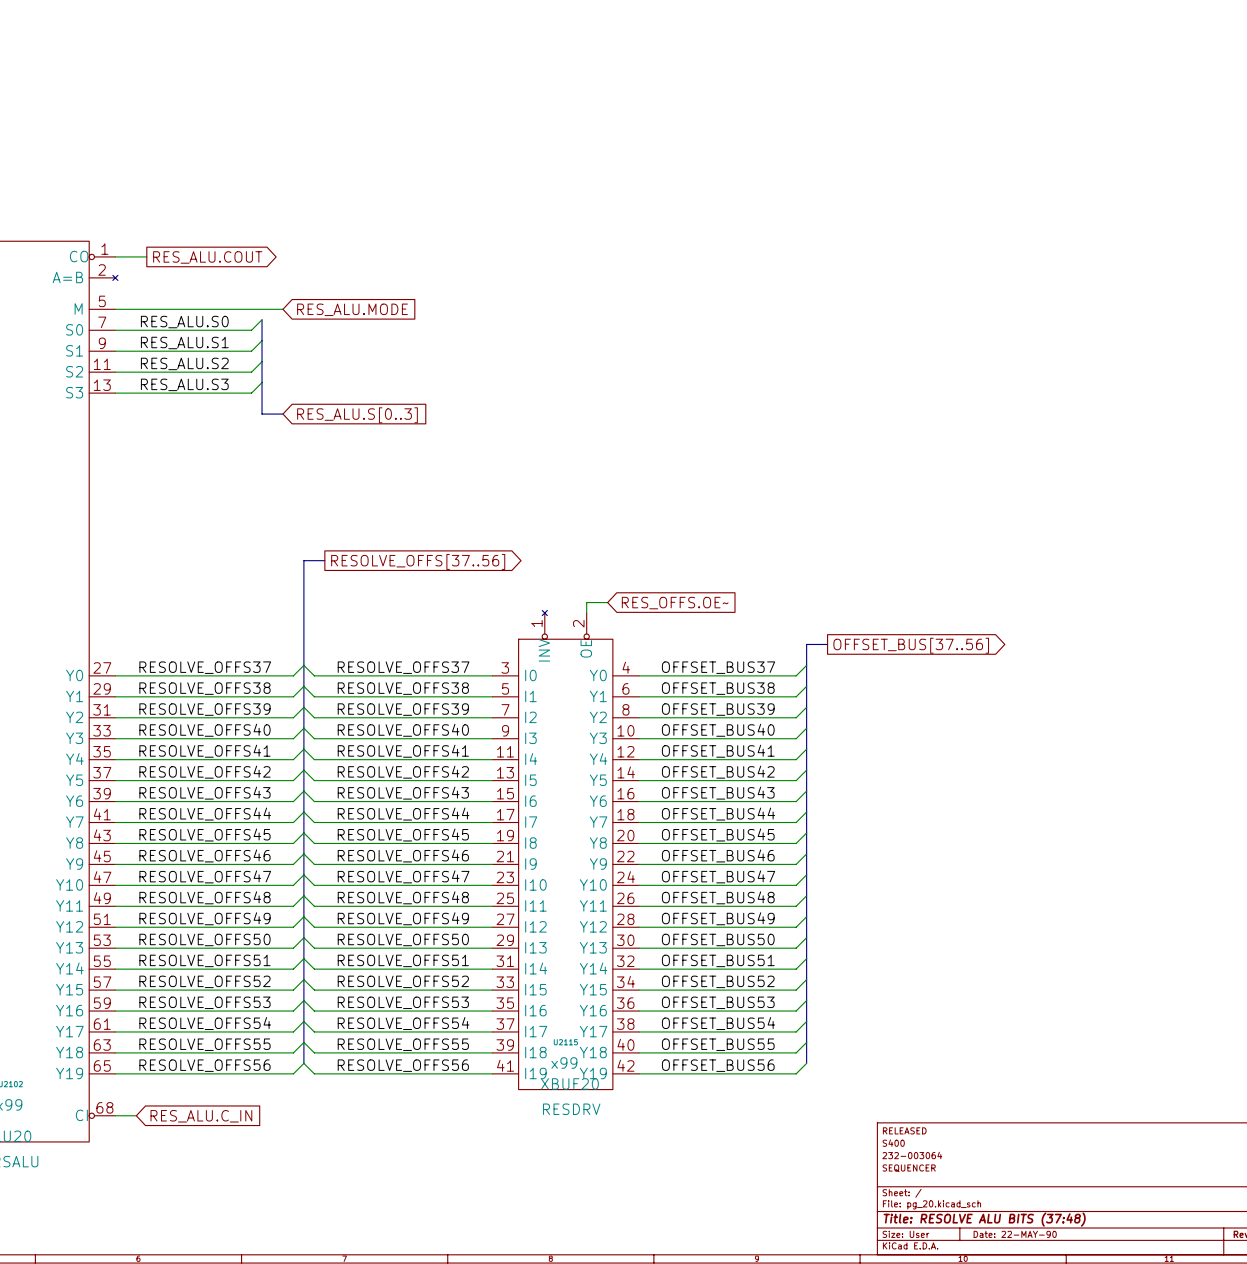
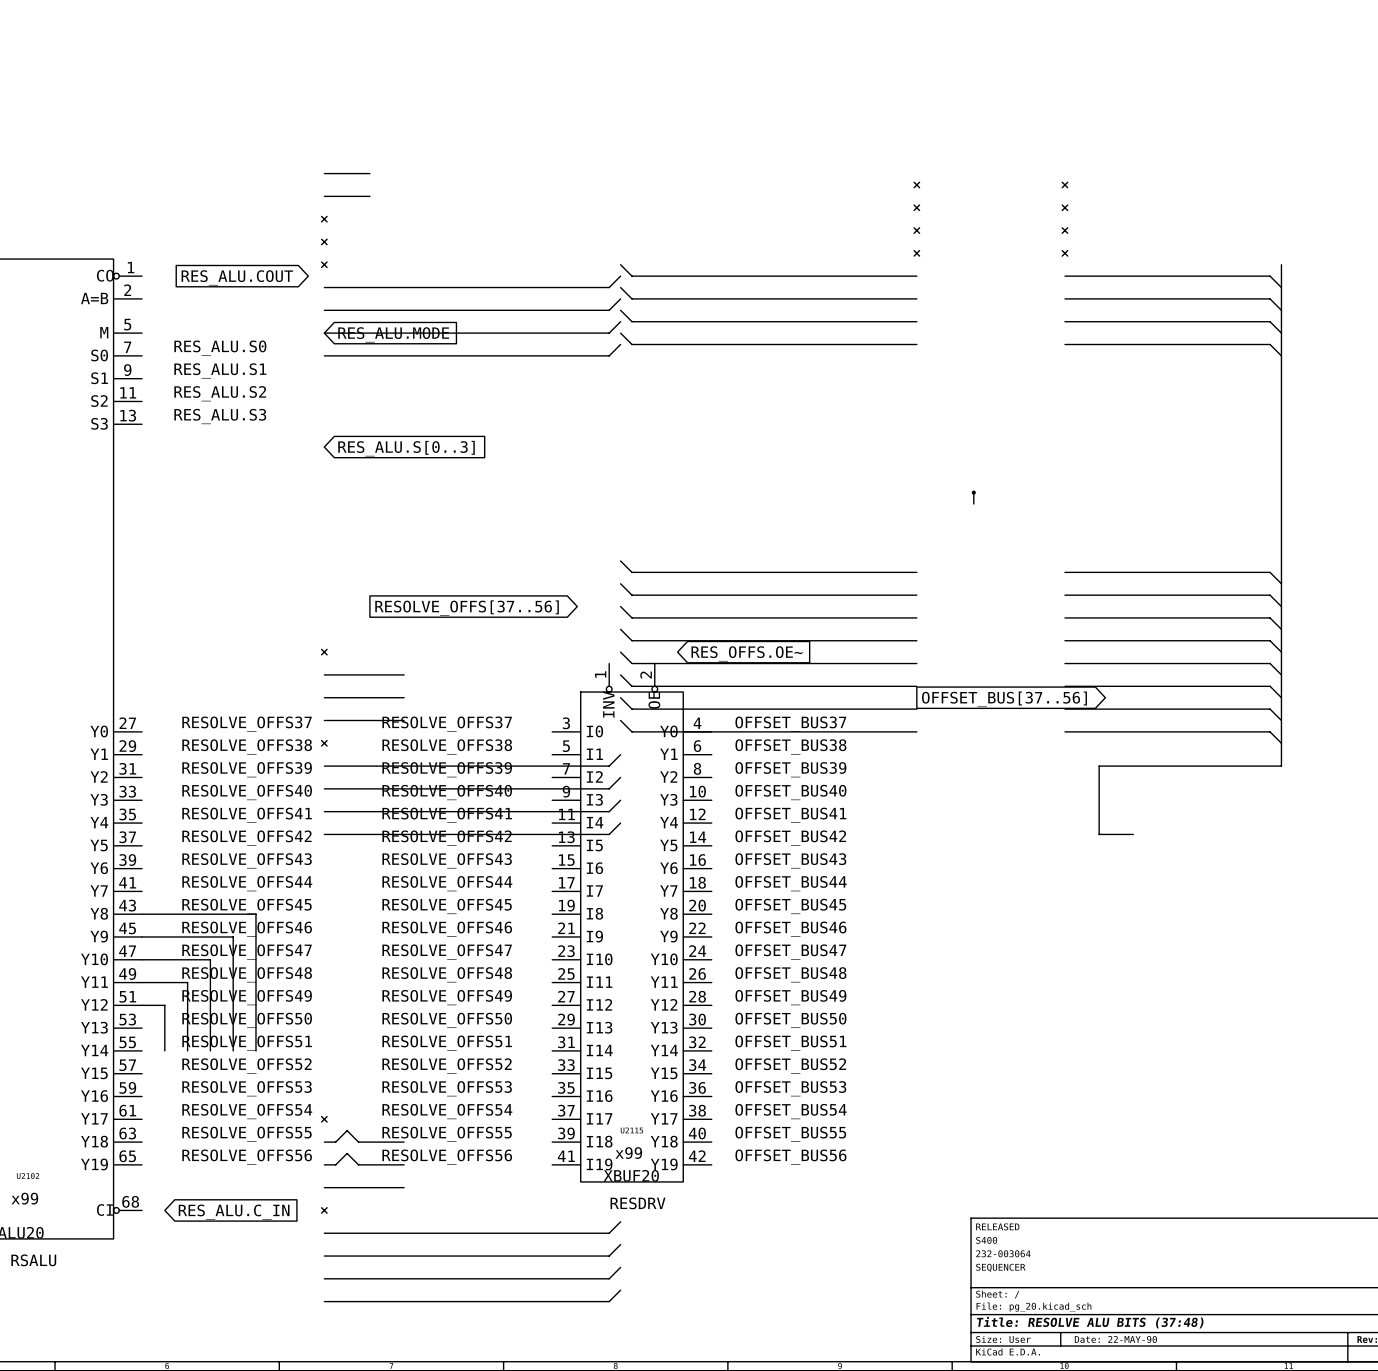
wire: none -> (324, 173) (369, 173)
no-connect mark: none -> (916, 184)
no-connect mark: none -> (1064, 184)
wire: none -> (324, 196) (369, 196)
no-connect mark: none -> (916, 207)
no-connect mark: none -> (1064, 207)
no-connect mark: none -> (324, 219)
no-connect mark: none -> (916, 230)
no-connect mark: none -> (1064, 230)
no-connect mark: none -> (324, 241)
no-connect mark: none -> (916, 253)
no-connect mark: none -> (1064, 253)
no-connect mark: none -> (324, 264)
wire: none -> (620, 264) (631, 276) (916, 276)
bus: none -> (1281, 264) (1281, 766) (1099, 766) (1099, 834) (1133, 834)
wire: (115, 256) (146, 256) -> none
wire: none -> (620, 276) (609, 287) (324, 287)
wire: none -> (1064, 276) (1270, 276) (1281, 287)
wire: none -> (620, 287) (631, 298) (916, 298)
no-connect mark: (115, 277) -> none
wire: none -> (620, 298) (609, 310) (324, 310)
wire: none -> (1064, 298) (1270, 298) (1281, 310)
wire: none -> (620, 310) (631, 321) (916, 321)
wire: none -> (1064, 321) (1270, 321) (1281, 333)
wire: (115, 309) (282, 309) -> (620, 321) (609, 333) (324, 333)
wire: none -> (620, 333) (631, 344) (916, 344)
bus: (262, 319) (262, 414) (282, 414) -> none
wire: (262, 319) (251, 330) (115, 330) -> none
wire: none -> (620, 344) (609, 355) (324, 355)
wire: none -> (1064, 344) (1270, 344) (1281, 355)
wire: (262, 340) (251, 351) (115, 351) -> none
wire: (262, 361) (251, 372) (115, 372) -> none
wire: (262, 382) (251, 393) (115, 393) -> none
wire: none -> (973, 492) (973, 504)
junction: none -> (973, 492)
wire: none -> (620, 560) (631, 572) (916, 572)
wire: none -> (1064, 572) (1270, 572) (1281, 583)
wire: none -> (620, 583) (631, 595) (916, 595)
wire: none -> (1064, 595) (1270, 595) (1281, 606)
bus: (324, 560) (303, 560) (303, 1063) -> none
wire: none -> (620, 606) (631, 617) (916, 617)
wire: none -> (1064, 617) (1270, 617) (1281, 629)
wire: none -> (620, 629) (631, 640) (916, 640)
wire: none -> (1064, 640) (1270, 640) (1281, 652)
no-connect mark: none -> (324, 652)
wire: none -> (620, 652) (631, 663) (916, 663)
wire: (607, 602) (586, 602) (586, 613) -> none
no-connect mark: (544, 613) -> none
wire: none -> (1064, 663) (1270, 663) (1281, 674)
wire: none -> (324, 674) (404, 674)
wire: none -> (620, 674) (631, 686) (916, 686)
wire: none -> (1064, 686) (1270, 686) (1281, 697)
wire: none -> (324, 697) (404, 697)
wire: none -> (620, 697) (631, 709) (916, 709)
bus: (827, 644) (806, 644) (806, 1063) -> none
wire: none -> (1064, 709) (1270, 709) (1281, 720)
wire: none -> (324, 720) (404, 720)
wire: none -> (620, 720) (631, 731) (711, 731)
wire: (806, 665) (796, 675) -> (916, 731) (882, 731)
wire: (115, 675) (293, 675) (303, 665) (314, 675) (492, 675) -> none
wire: none -> (1064, 731) (1270, 731) (1281, 743)
no-connect mark: none -> (324, 743)
wire: (806, 686) (796, 696) (639, 696) -> none
wire: (115, 696) (293, 696) (303, 686) (314, 696) (492, 696) -> none
wire: none -> (620, 754) (609, 766) (324, 766)
wire: (806, 707) (796, 717) (639, 717) -> none
wire: (115, 717) (293, 717) (303, 707) (314, 717) (492, 717) -> none
wire: none -> (620, 777) (609, 788) (324, 788)
wire: (806, 728) (796, 738) (639, 738) -> none
wire: (115, 738) (293, 738) (303, 728) (314, 738) (492, 738) -> none
wire: none -> (620, 800) (609, 811) (324, 811)
wire: (806, 749) (796, 759) (639, 759) -> none
wire: (115, 759) (293, 759) (303, 749) (314, 759) (492, 759) -> none
wire: none -> (620, 823) (609, 834) (324, 834)
wire: (806, 770) (796, 780) (639, 780) -> none
wire: (115, 780) (293, 780) (303, 770) (314, 780) (492, 780) -> none
wire: (806, 791) (796, 801) (639, 801) -> none
wire: (115, 801) (293, 801) (303, 791) (314, 801) (492, 801) -> none
wire: (806, 812) (796, 822) (639, 822) -> none
wire: (115, 822) (293, 822) (303, 812) (314, 822) (492, 822) -> none
wire: (806, 832) (796, 843) (639, 843) -> none
wire: (220, 843) (293, 843) (303, 832) (314, 843) (492, 843) -> (255, 914) (255, 1050)
wire: (806, 853) (796, 864) (639, 864) -> none
wire: (199, 864) (293, 864) (303, 853) (314, 864) (492, 864) -> (233, 936) (233, 1050)
wire: (806, 874) (796, 885) (639, 885) -> none
wire: (178, 885) (293, 885) (303, 874) (314, 885) (492, 885) -> (210, 959) (210, 1050)
wire: (806, 895) (796, 906) (639, 906) -> none
wire: (157, 906) (293, 906) (303, 895) (314, 906) (492, 906) -> (187, 982) (187, 1050)
wire: (806, 916) (796, 927) (639, 927) -> none
wire: (136, 927) (293, 927) (303, 916) (314, 927) (492, 927) -> (164, 1005) (164, 1050)
wire: (806, 937) (796, 948) (639, 948) -> none
wire: (115, 948) (293, 948) (303, 937) (314, 948) (492, 948) -> none
wire: (806, 958) (796, 969) (639, 969) -> none
wire: (115, 969) (293, 969) (303, 958) (314, 969) (492, 969) -> none
wire: (806, 979) (796, 990) (639, 990) -> none
wire: (115, 990) (293, 990) (303, 979) (314, 990) (492, 990) -> none
wire: (806, 1000) (796, 1011) (639, 1011) -> none
wire: (115, 1011) (293, 1011) (303, 1000) (314, 1011) (492, 1011) -> none
wire: (806, 1021) (796, 1031) (639, 1031) -> none
wire: (115, 1031) (293, 1031) (303, 1021) (314, 1031) (492, 1031) -> none
no-connect mark: none -> (324, 1119)
wire: (806, 1042) (796, 1052) (639, 1052) -> none
wire: (115, 1052) (282, 1052) -> none
wire: (356, 1052) (492, 1052) -> none
wire: (806, 1063) (796, 1073) (639, 1073) -> none
wire: (115, 1073) (282, 1073) -> none
wire: (356, 1073) (492, 1073) -> none
wire: none -> (324, 1187) (404, 1187)
wire: (115, 1115) (136, 1115) -> none
no-connect mark: none -> (324, 1210)
wire: none -> (620, 1221) (609, 1233) (324, 1233)
wire: none -> (620, 1244) (609, 1256) (324, 1256)
wire: none -> (620, 1267) (609, 1278) (324, 1278)
wire: none -> (620, 1290) (609, 1301) (324, 1301)

